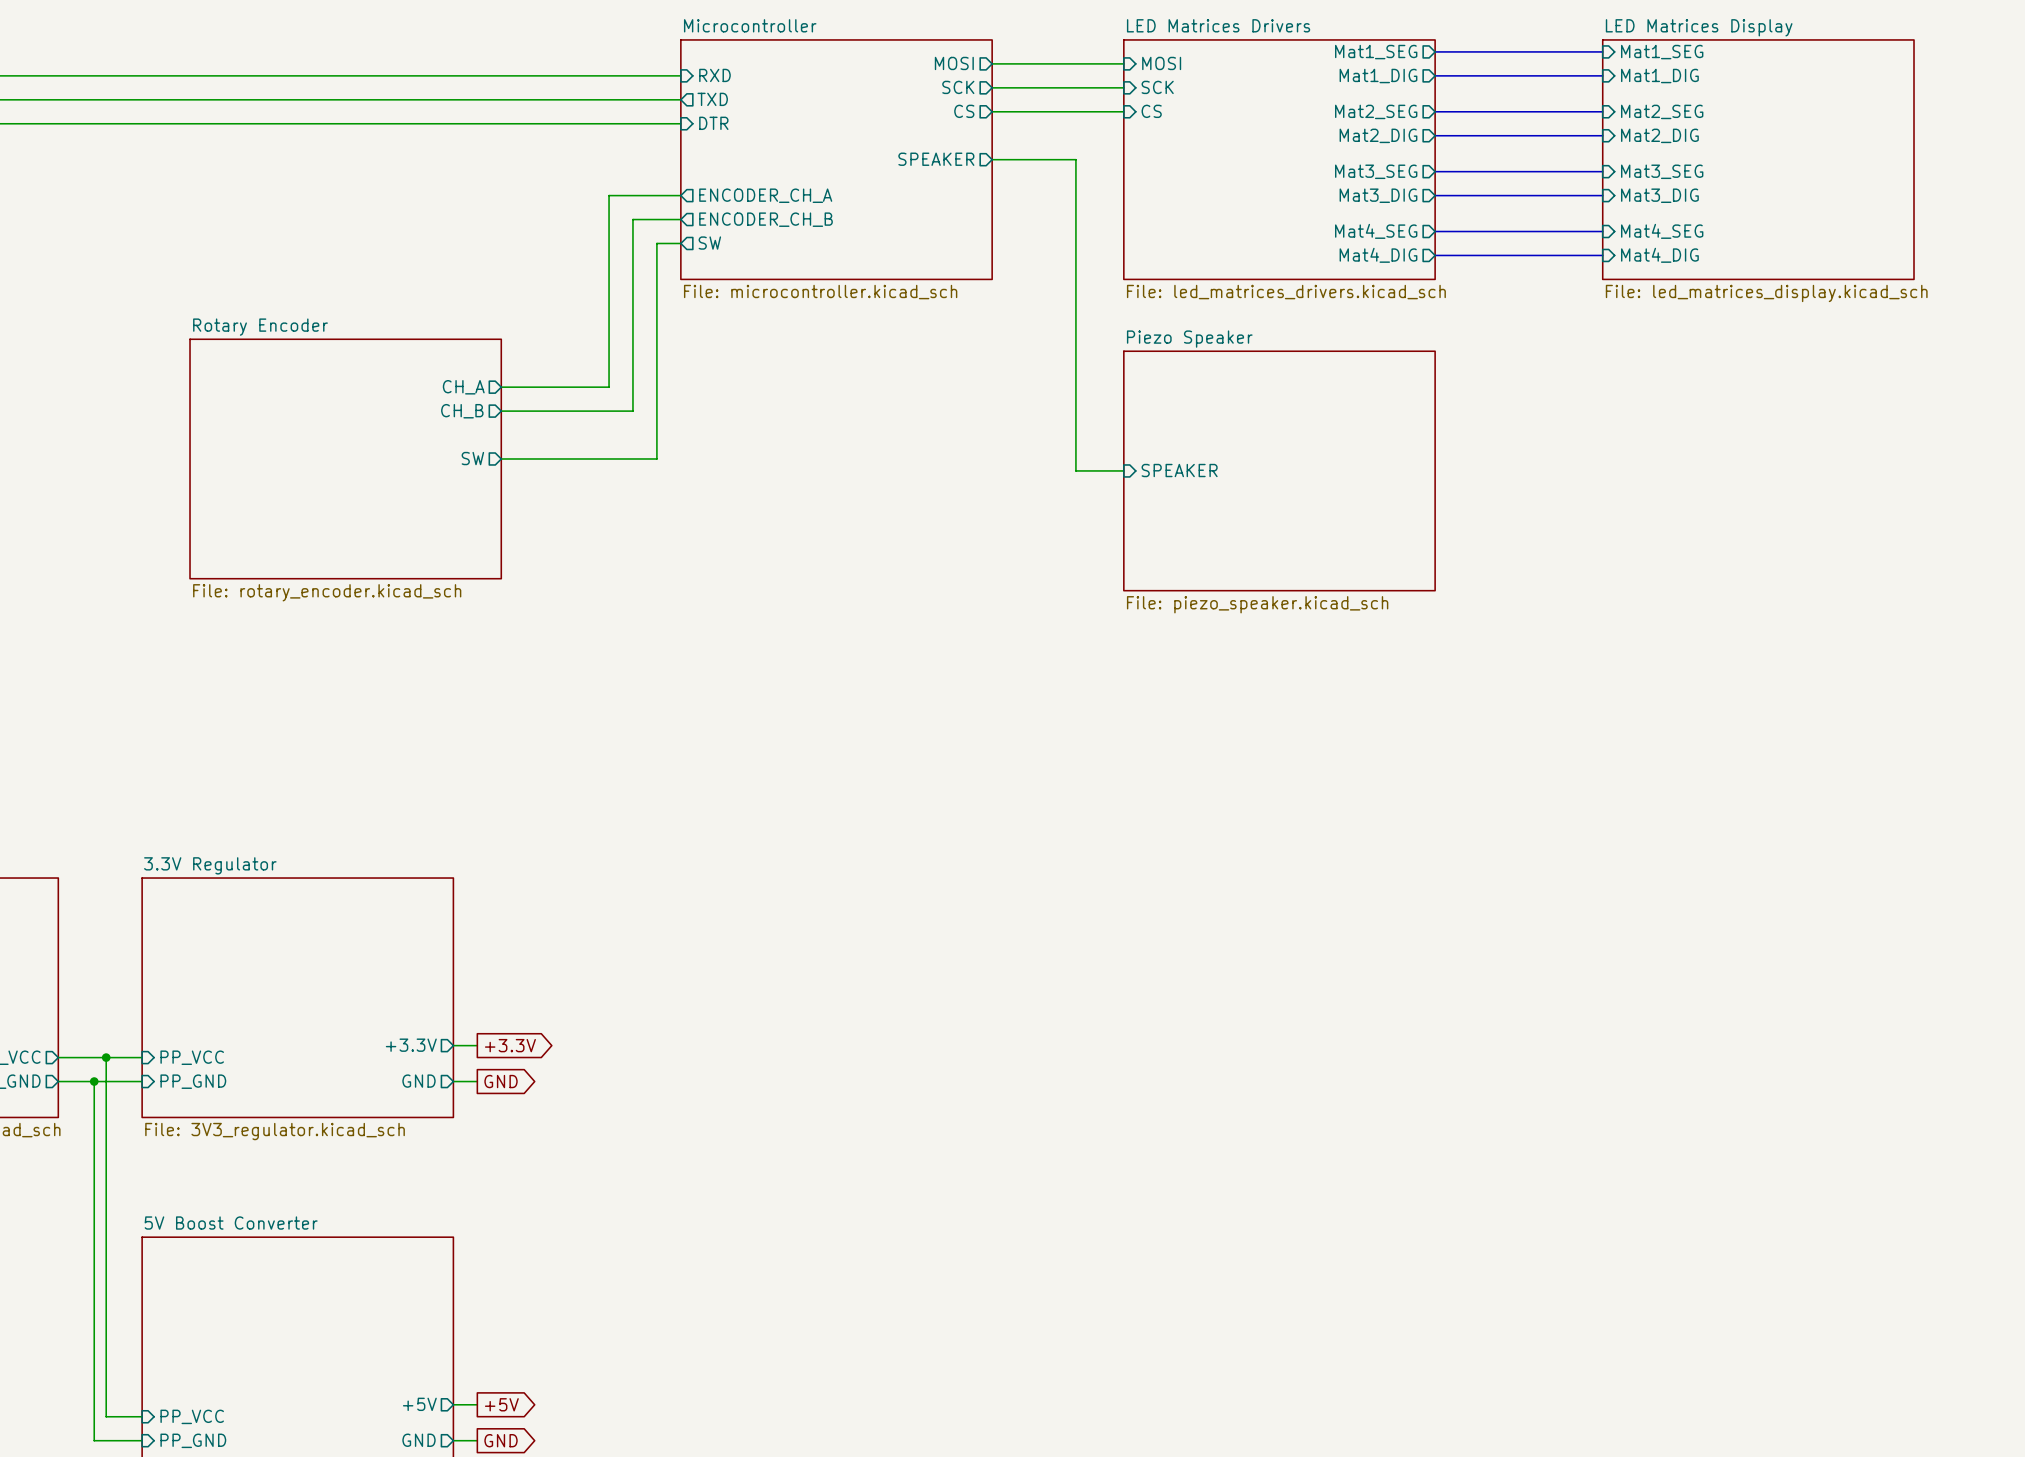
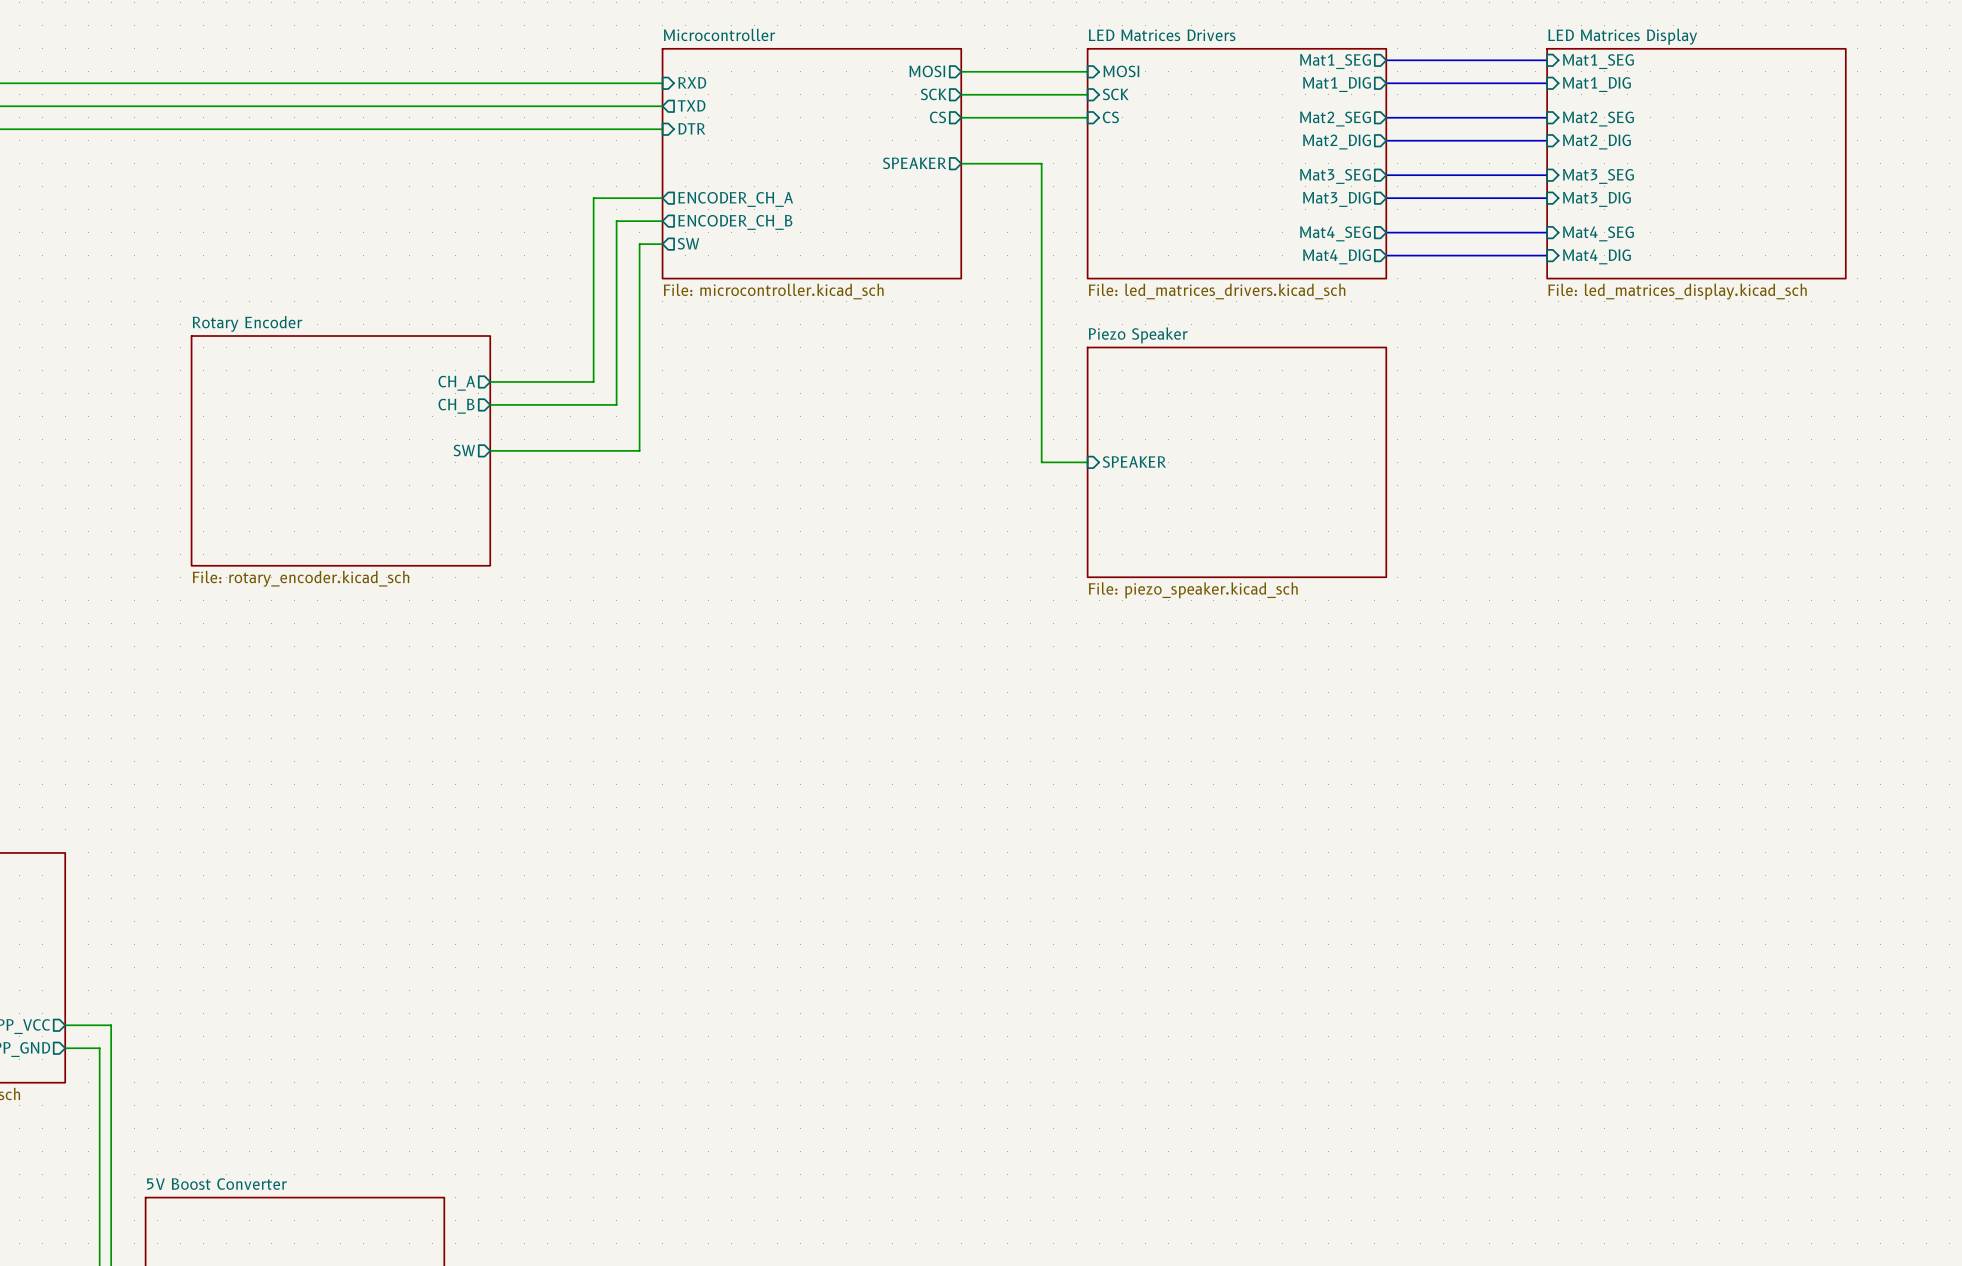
sheet 3.3V Regulator: File: 3V3_regulator.kicad_sch (297, 997) -> none
sheet pin: +3.3V (411, 1045) -> none
wire: (453, 1045) (477, 1045) -> none
global label: +3.3V (510, 1045) -> none
wire: (106, 1057) (142, 1057) -> none
junction: (106, 1057) -> none
sheet pin: PP_VCC (192, 1057) -> none
wire: (94, 1081) (142, 1081) -> none
junction: (94, 1081) -> none
sheet pin: PP_GND (193, 1081) -> none
sheet pin: GND (419, 1081) -> none
wire: (453, 1081) (477, 1081) -> none
global label: GND (501, 1081) -> none

